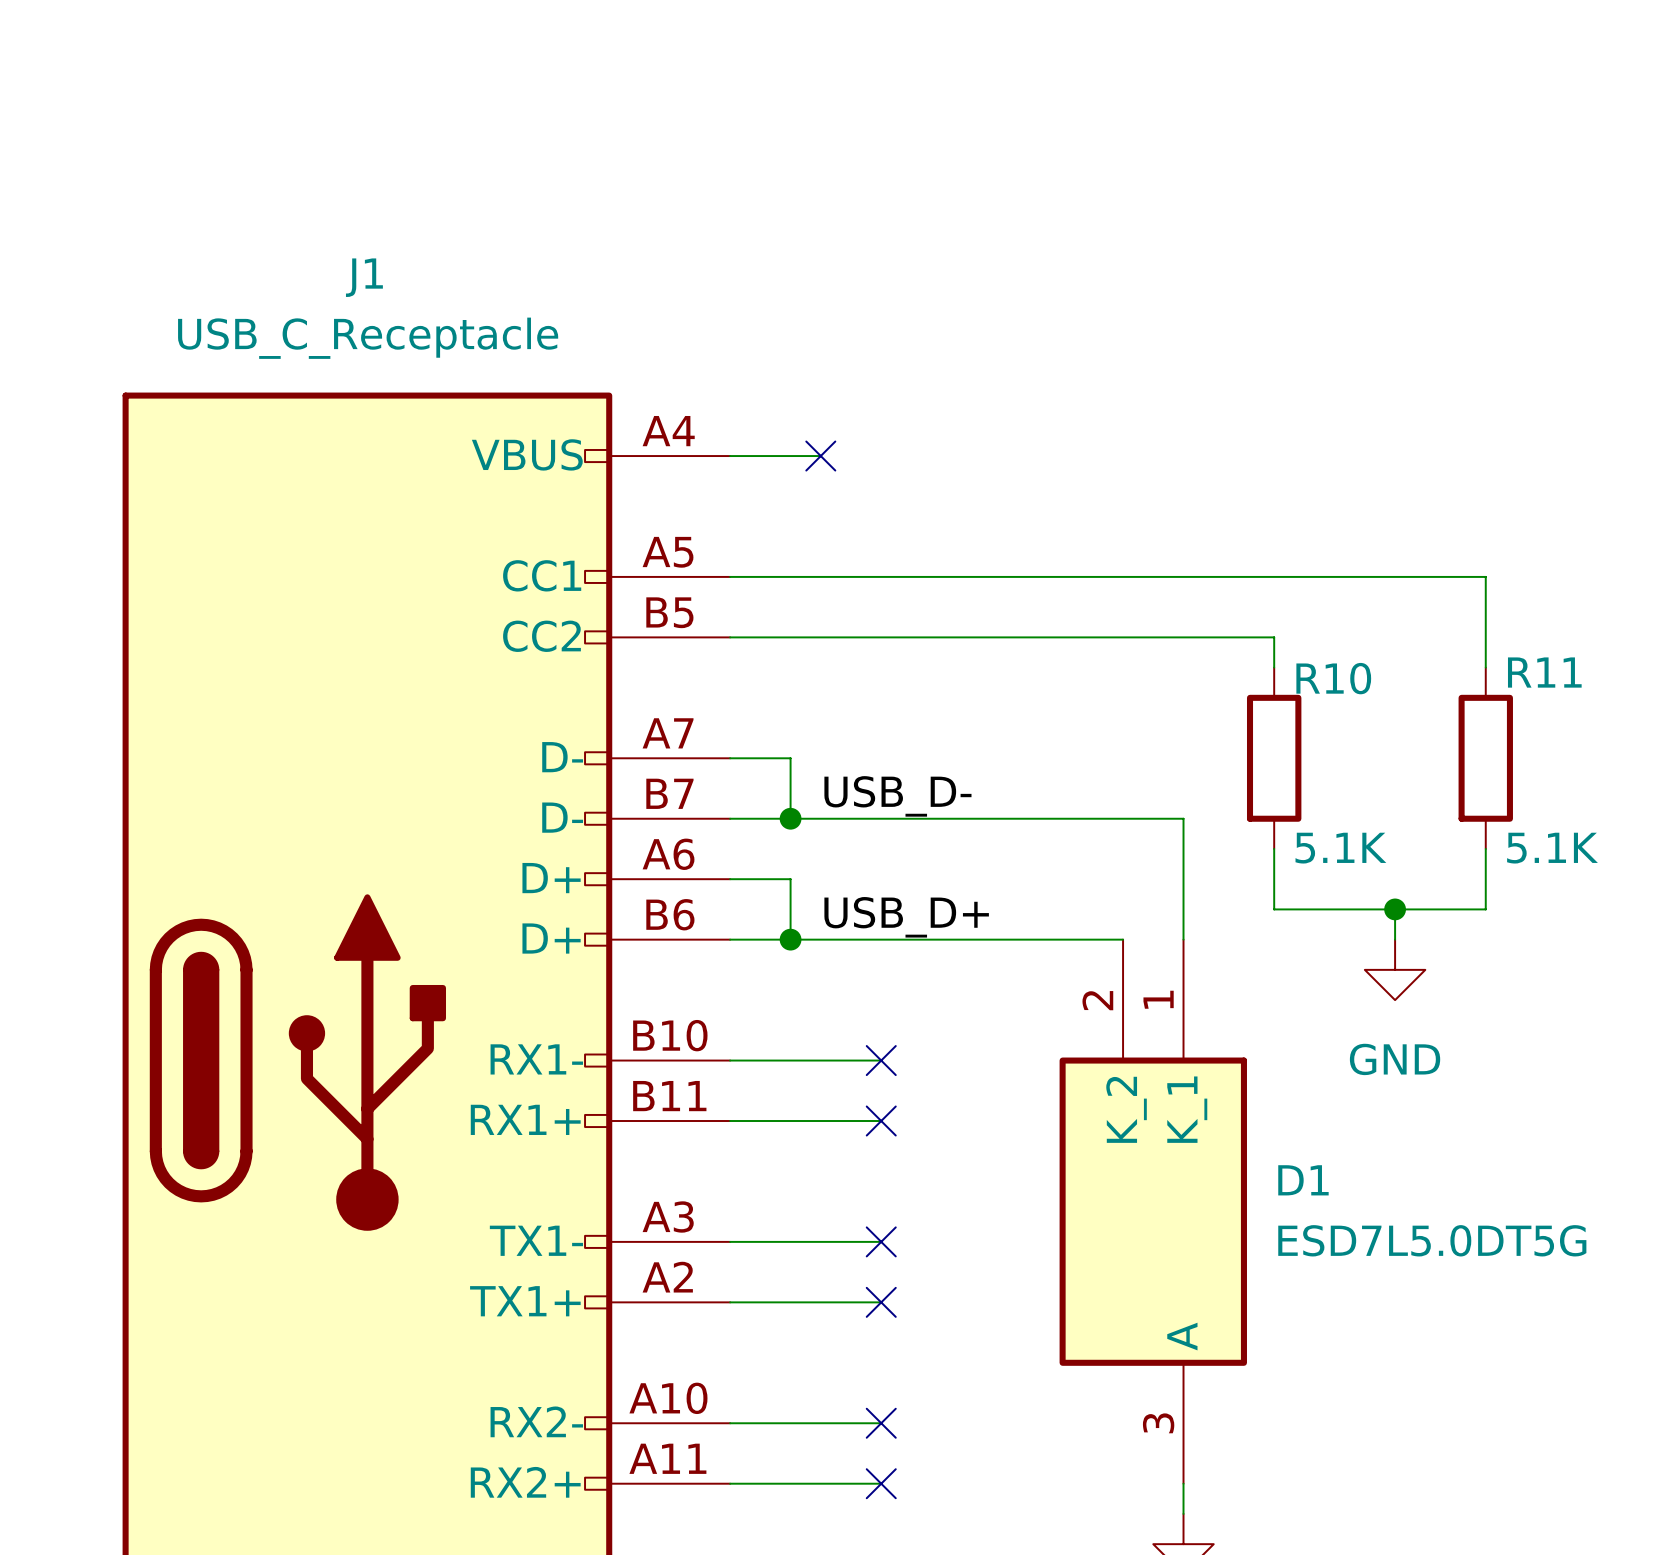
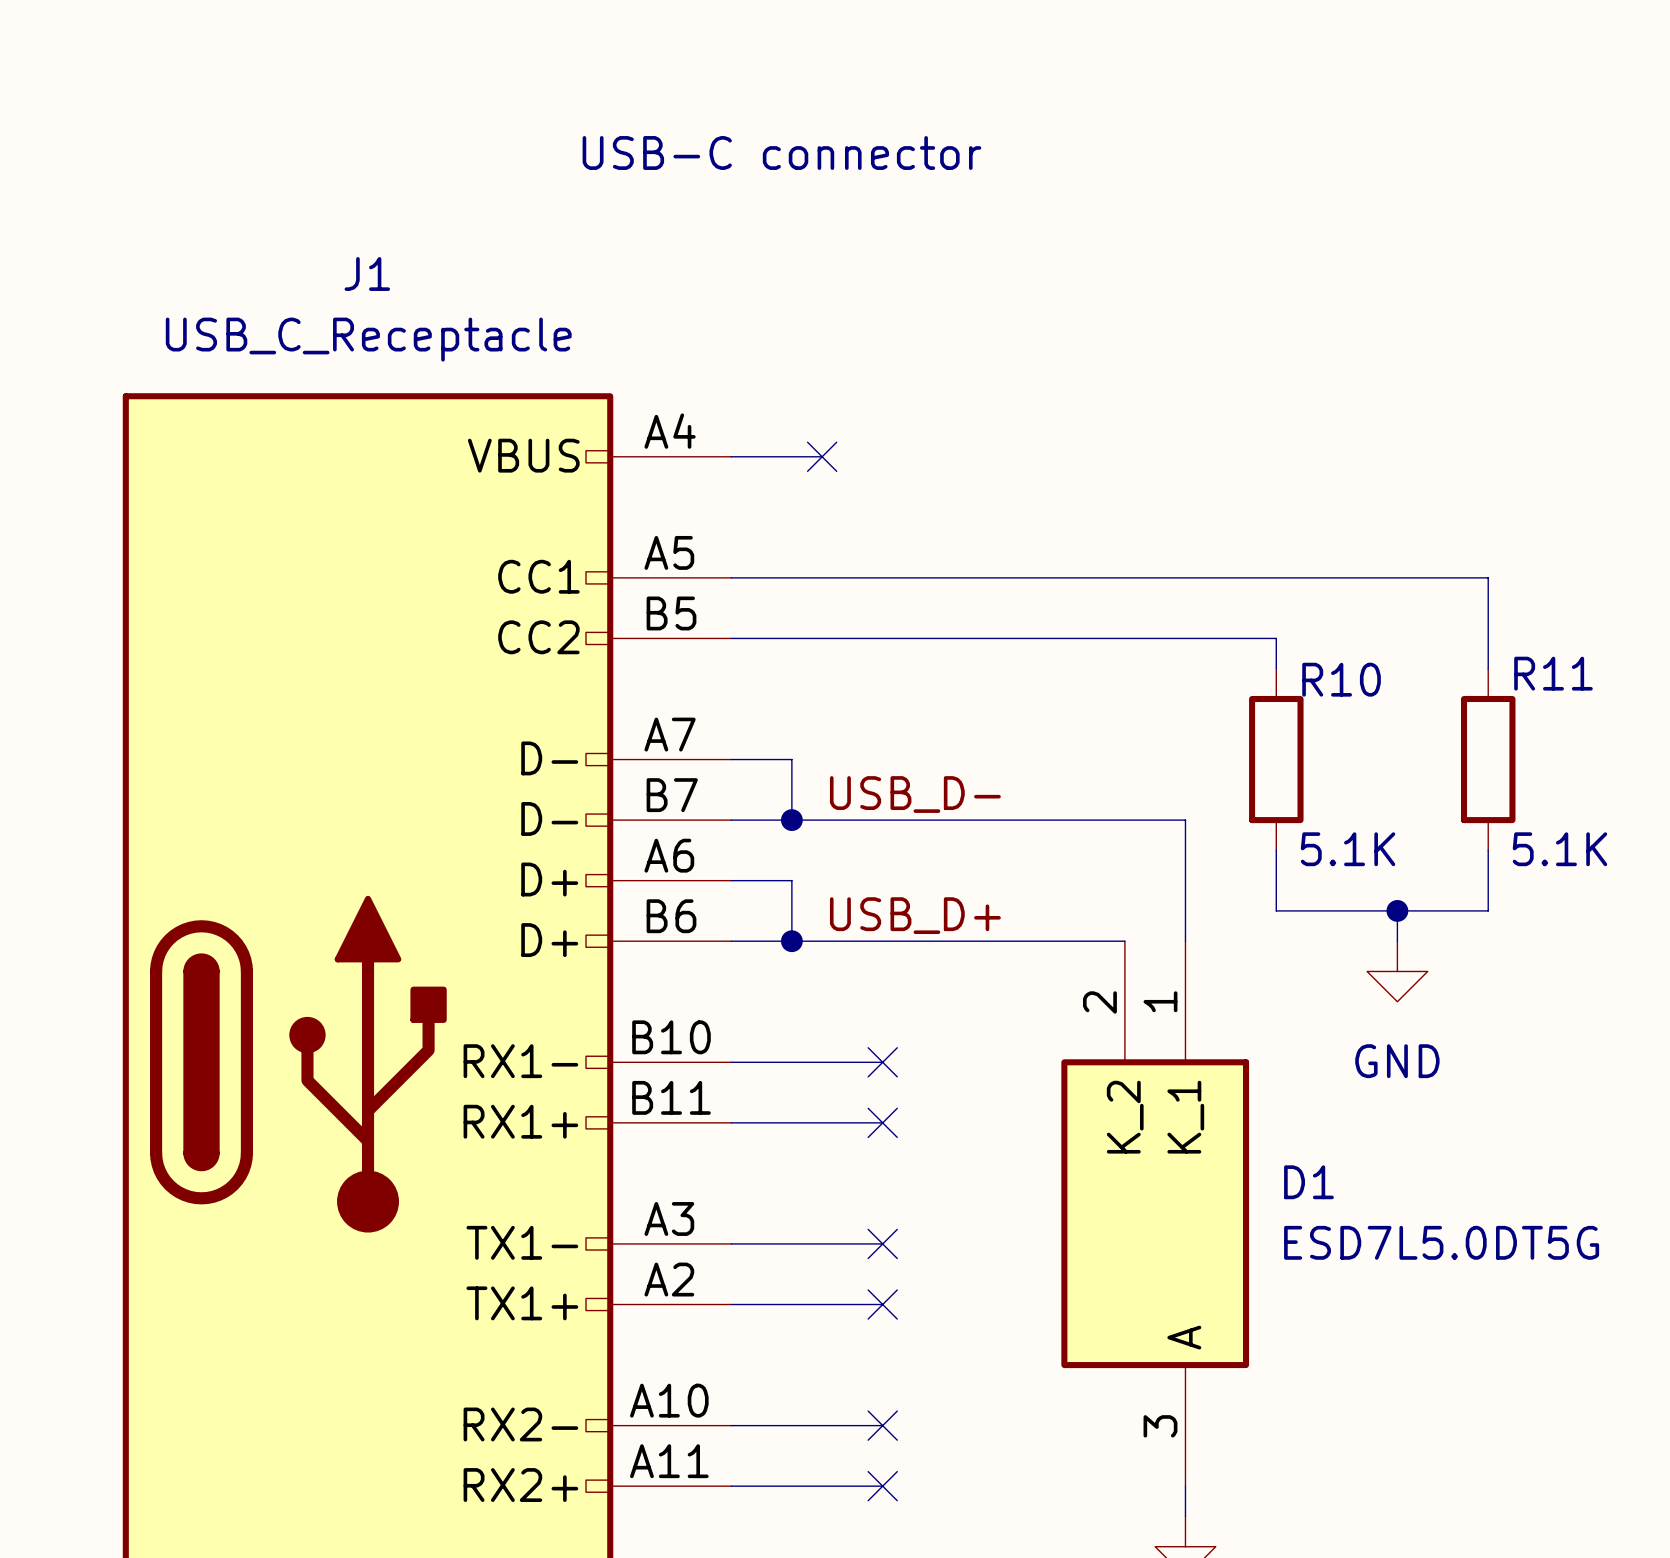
text: none -> USB-C connector (781, 152)

